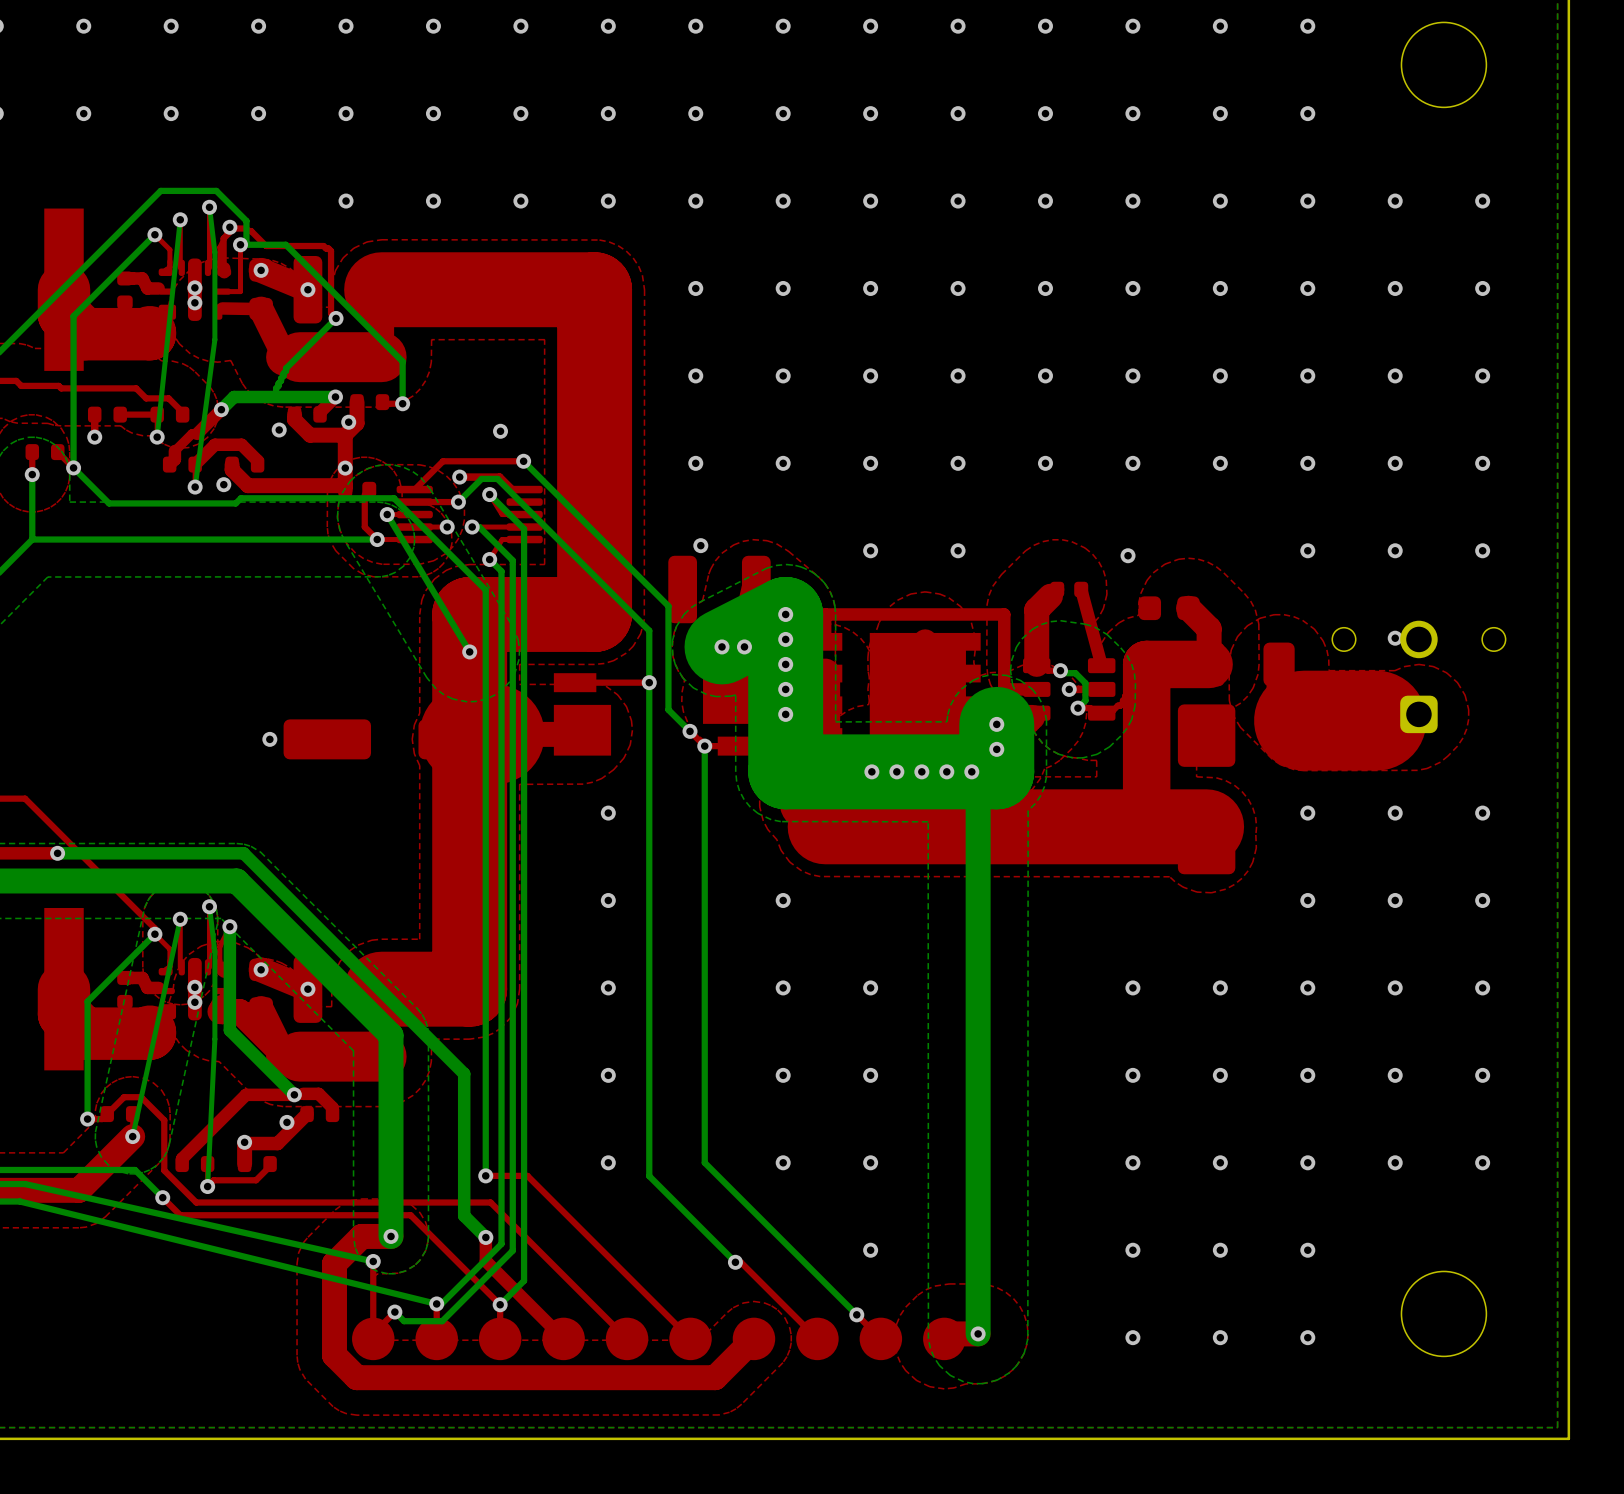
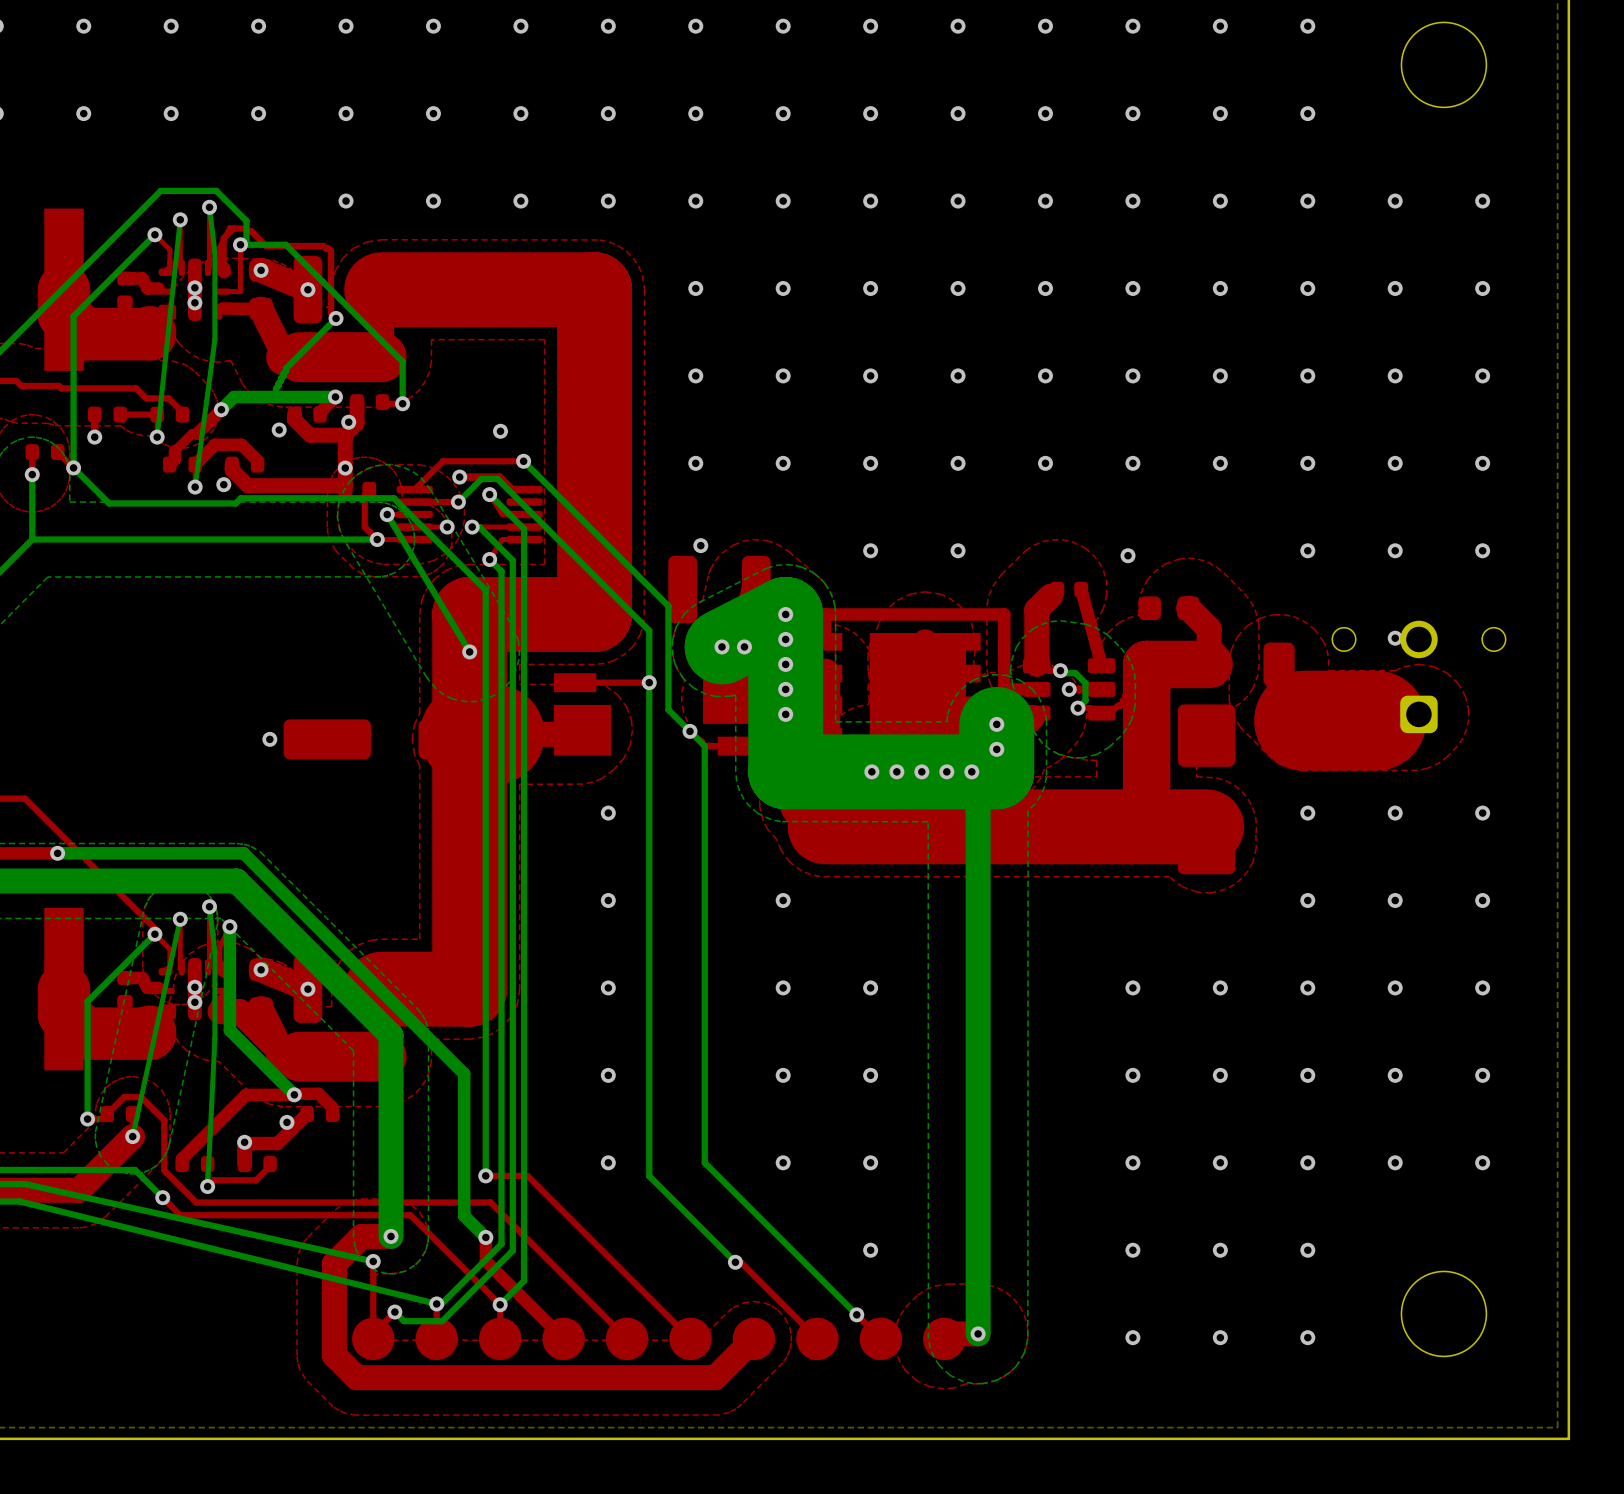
via: (229, 227) -> none
bottom track: none -> (690, 731) (704, 746)
via: (704, 746) -> none

